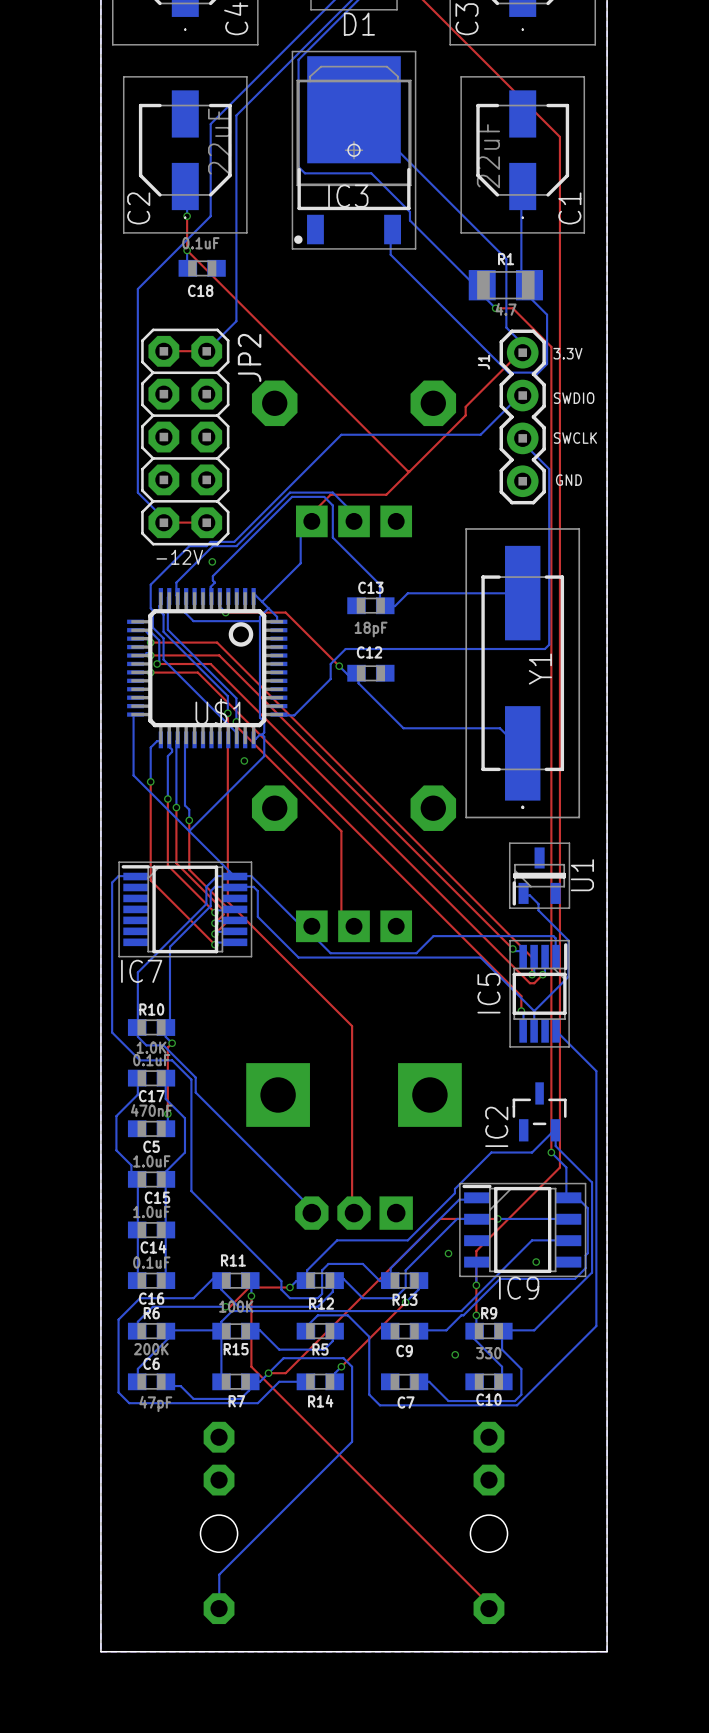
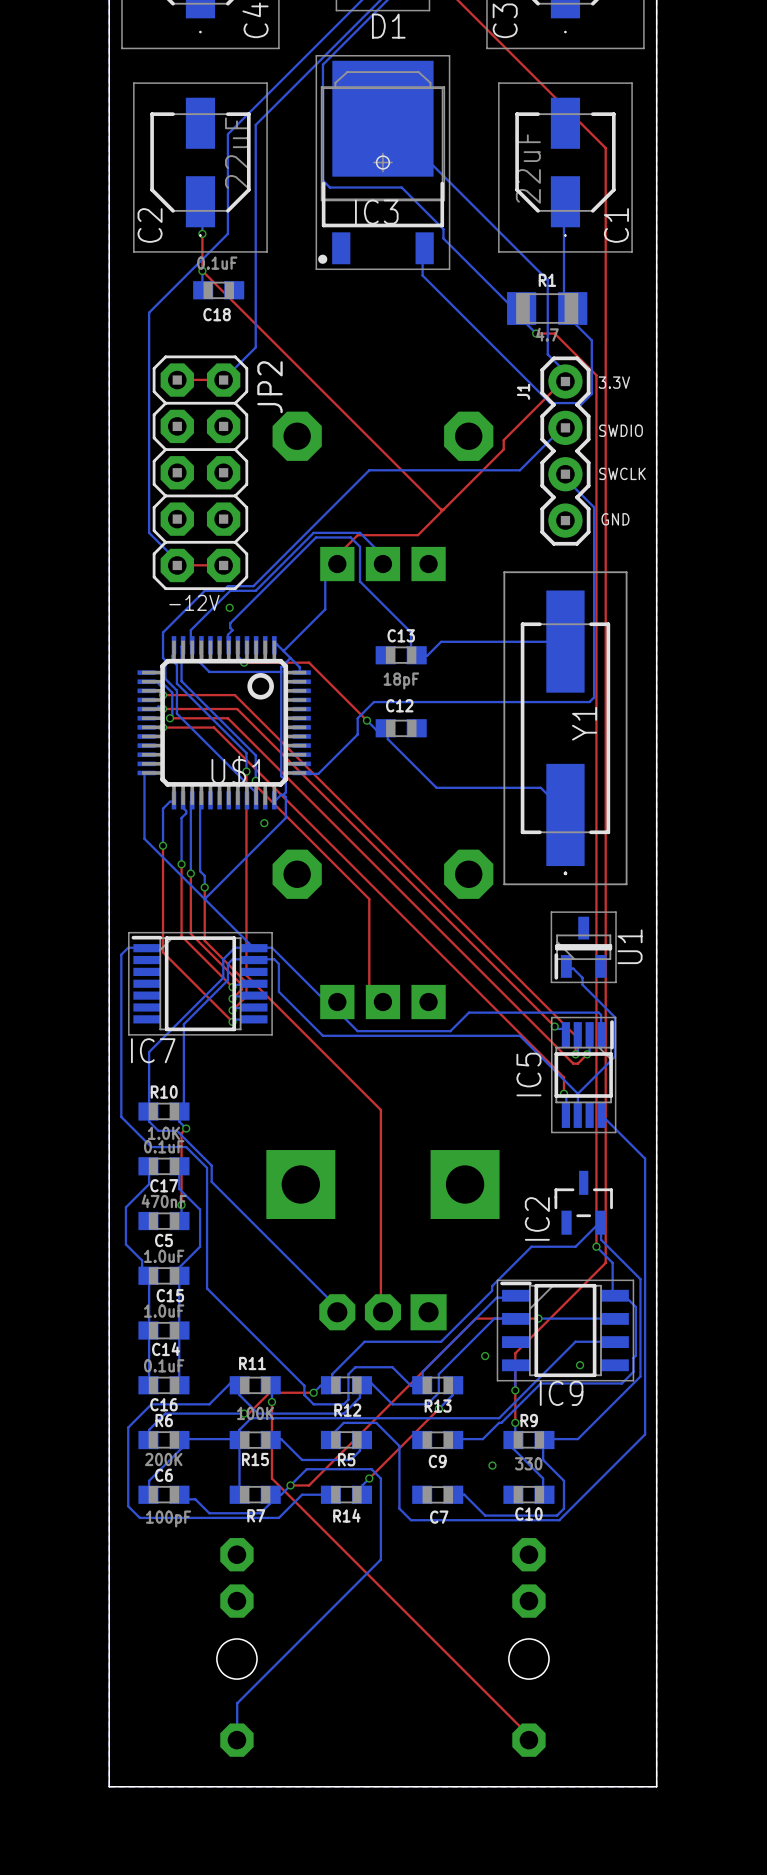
C6 value: 47pF (155, 1403) -> 100pF (168, 1519)

